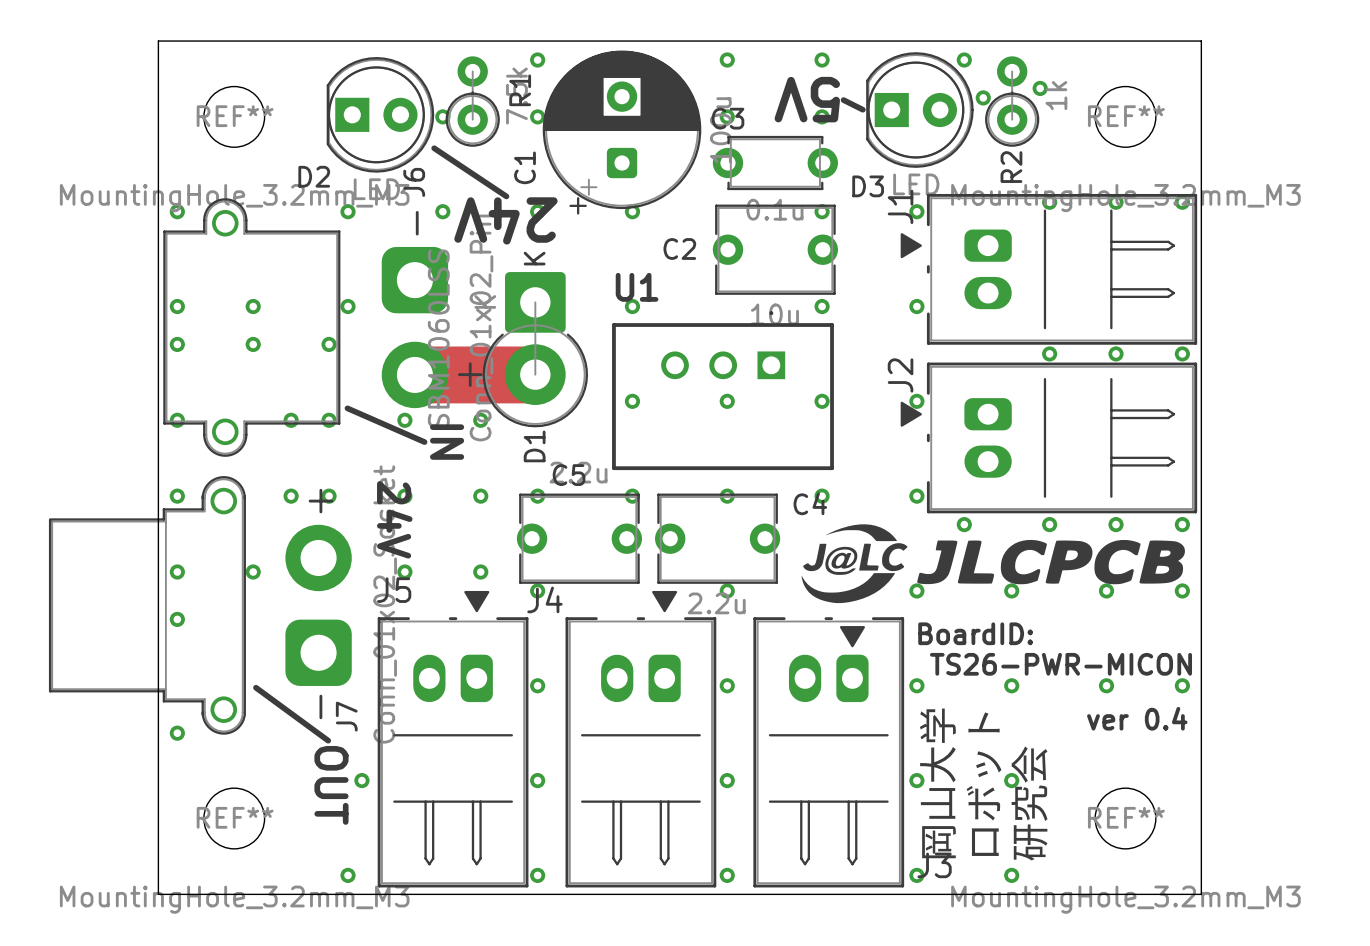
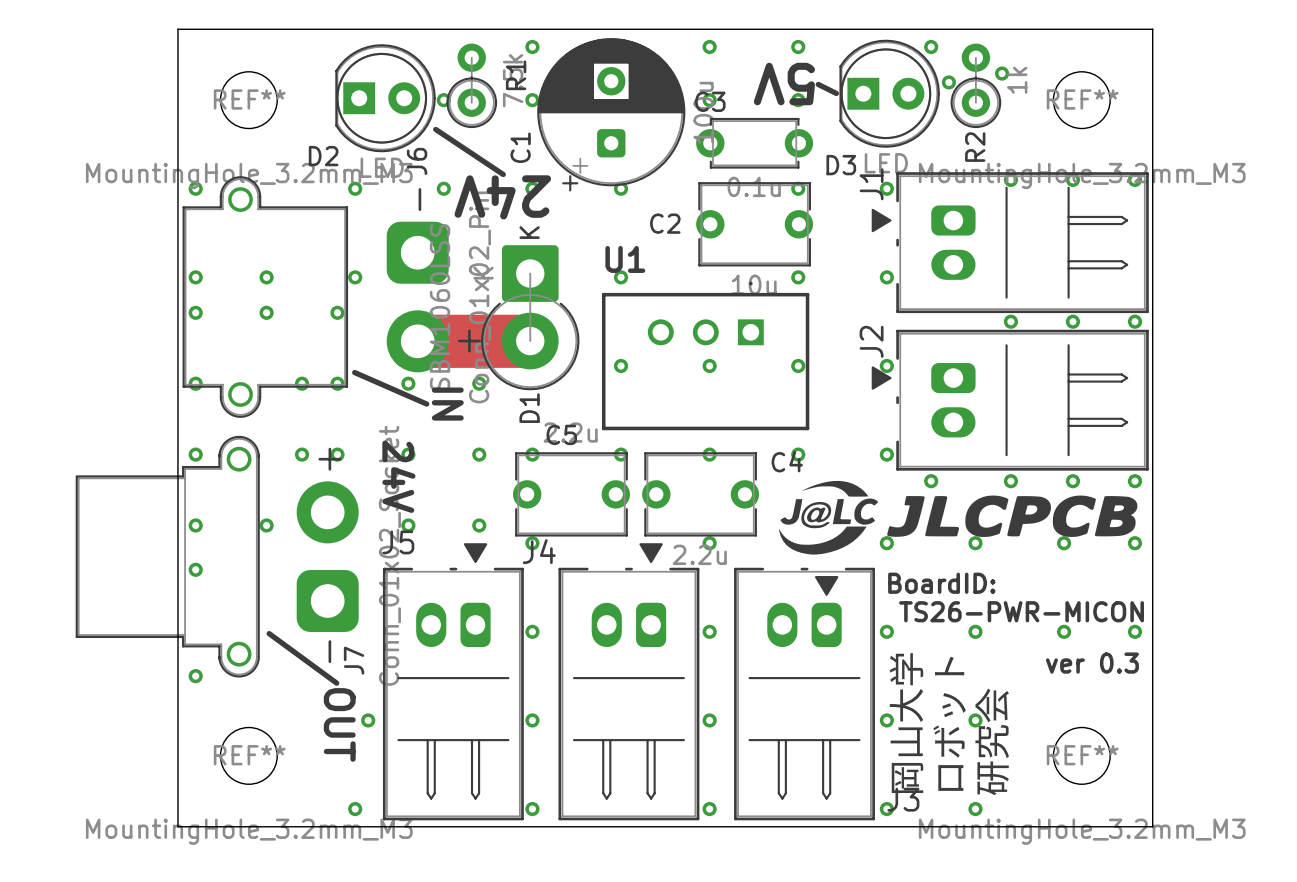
text: ver 0.4 (1137, 718) -> ver 0.3 (1092, 663)

